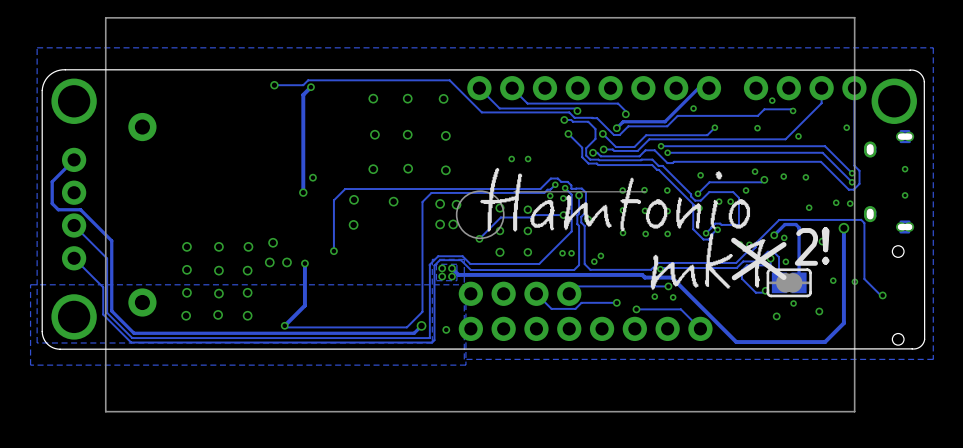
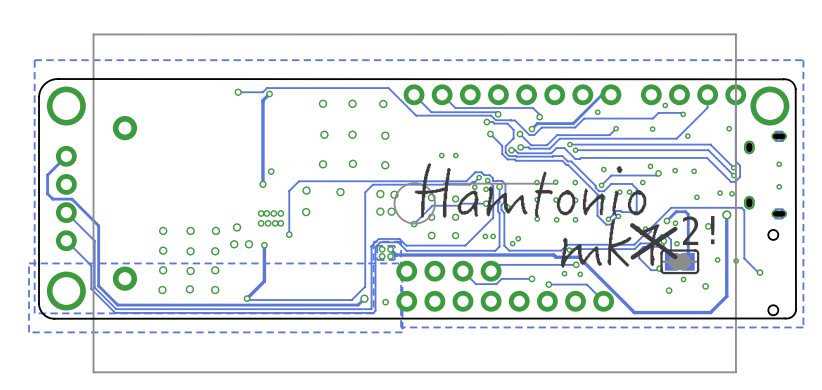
via: none -> (261, 213)
via: none -> (266, 213)
via: none -> (273, 213)
via: none -> (280, 213)
via: none -> (261, 223)
via: none -> (268, 223)
via: none -> (275, 223)
via: none -> (280, 223)

